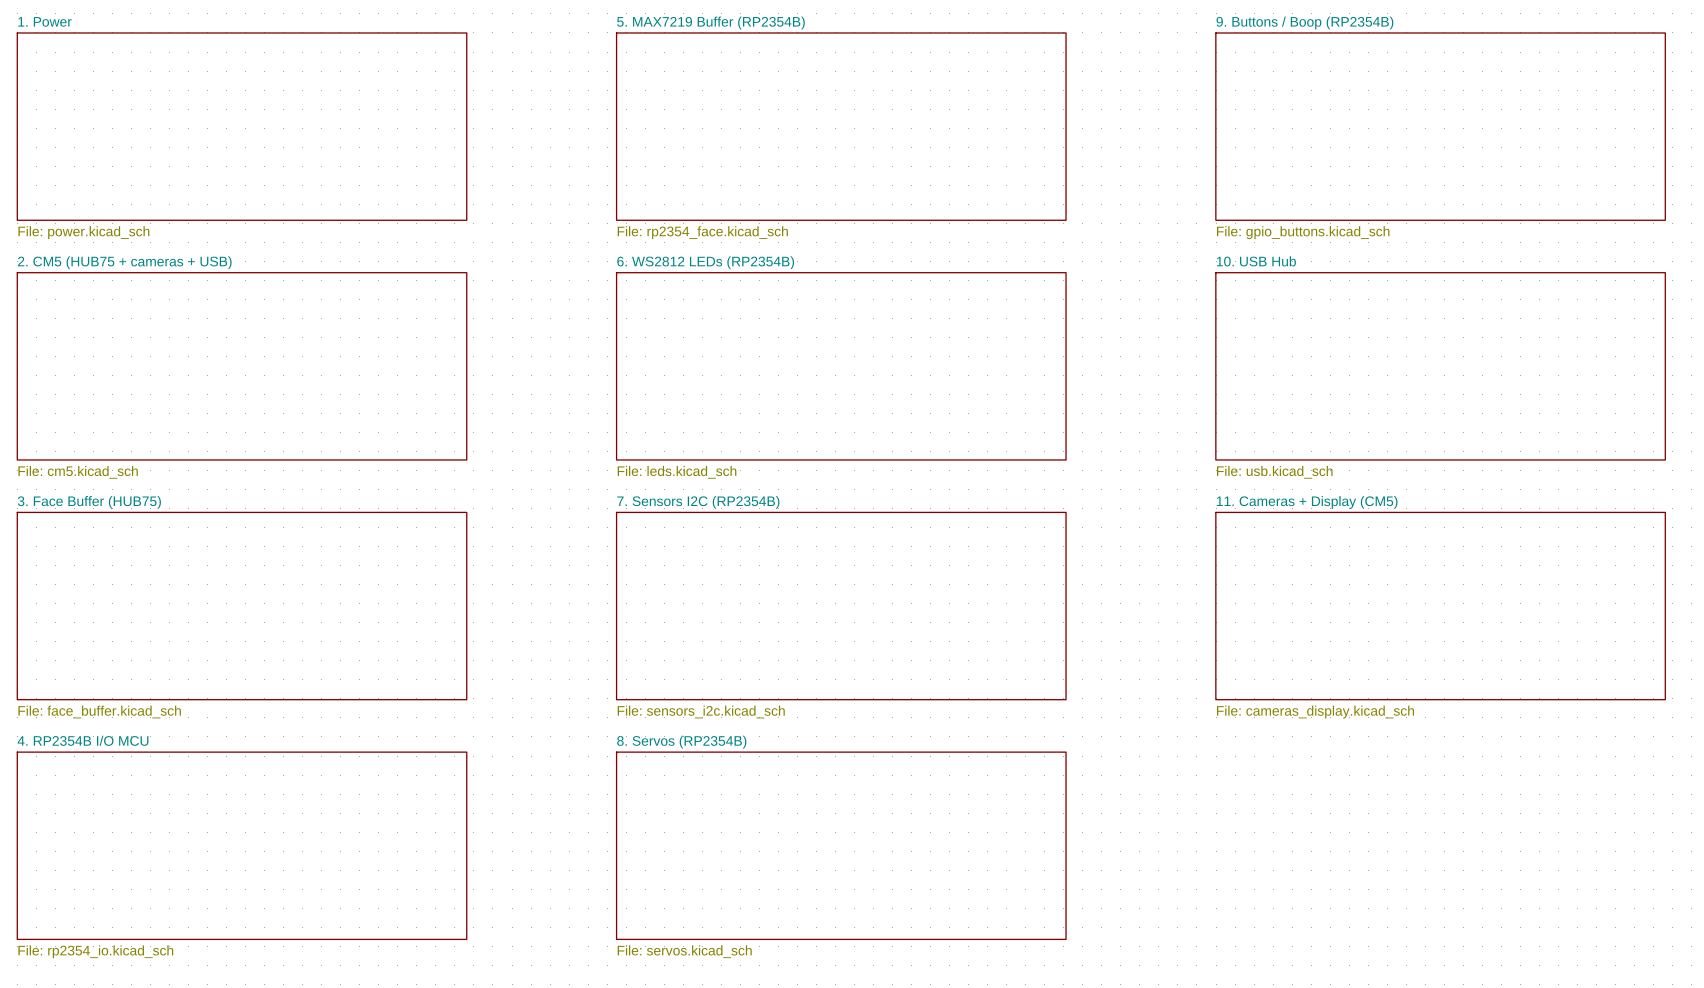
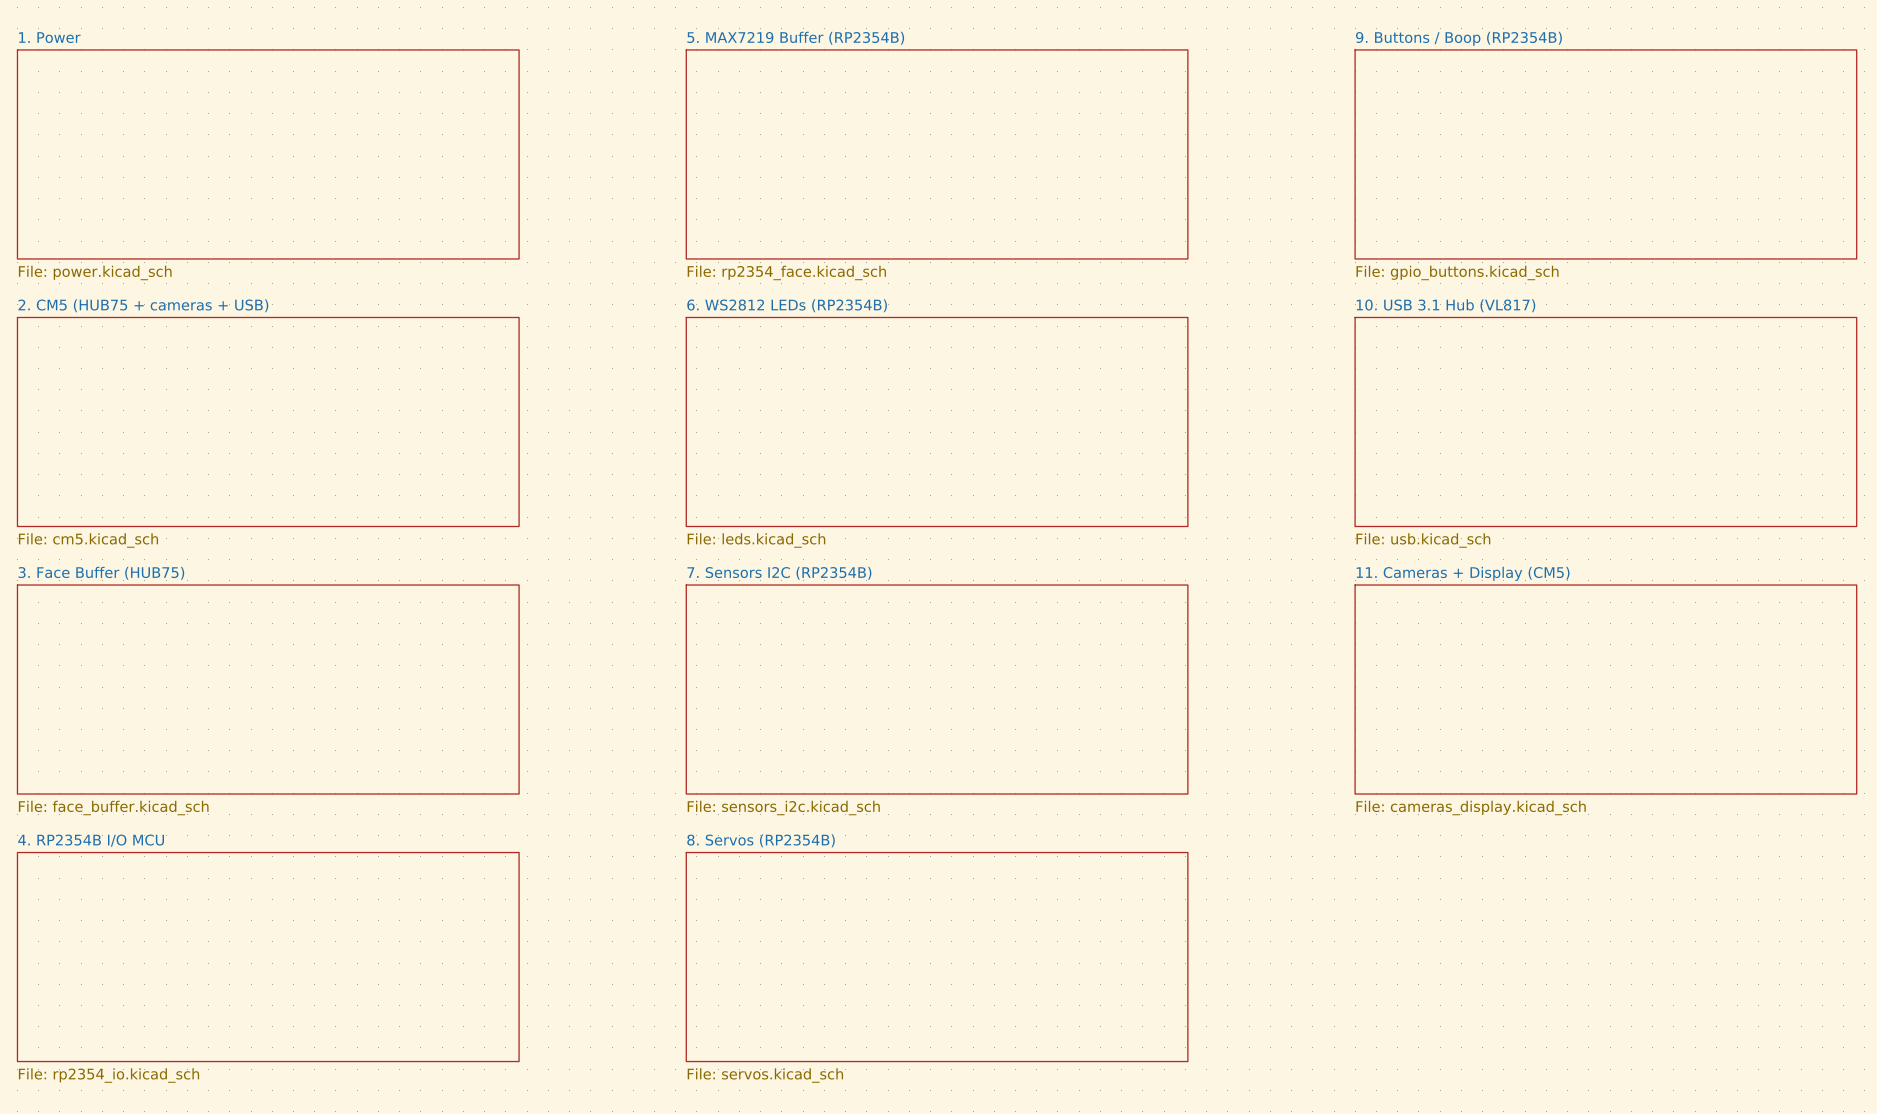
sheet 10. USB Hub name: 10. USB Hub (1256, 261) -> 10. USB 3.1 Hub (VL817) (1445, 305)

